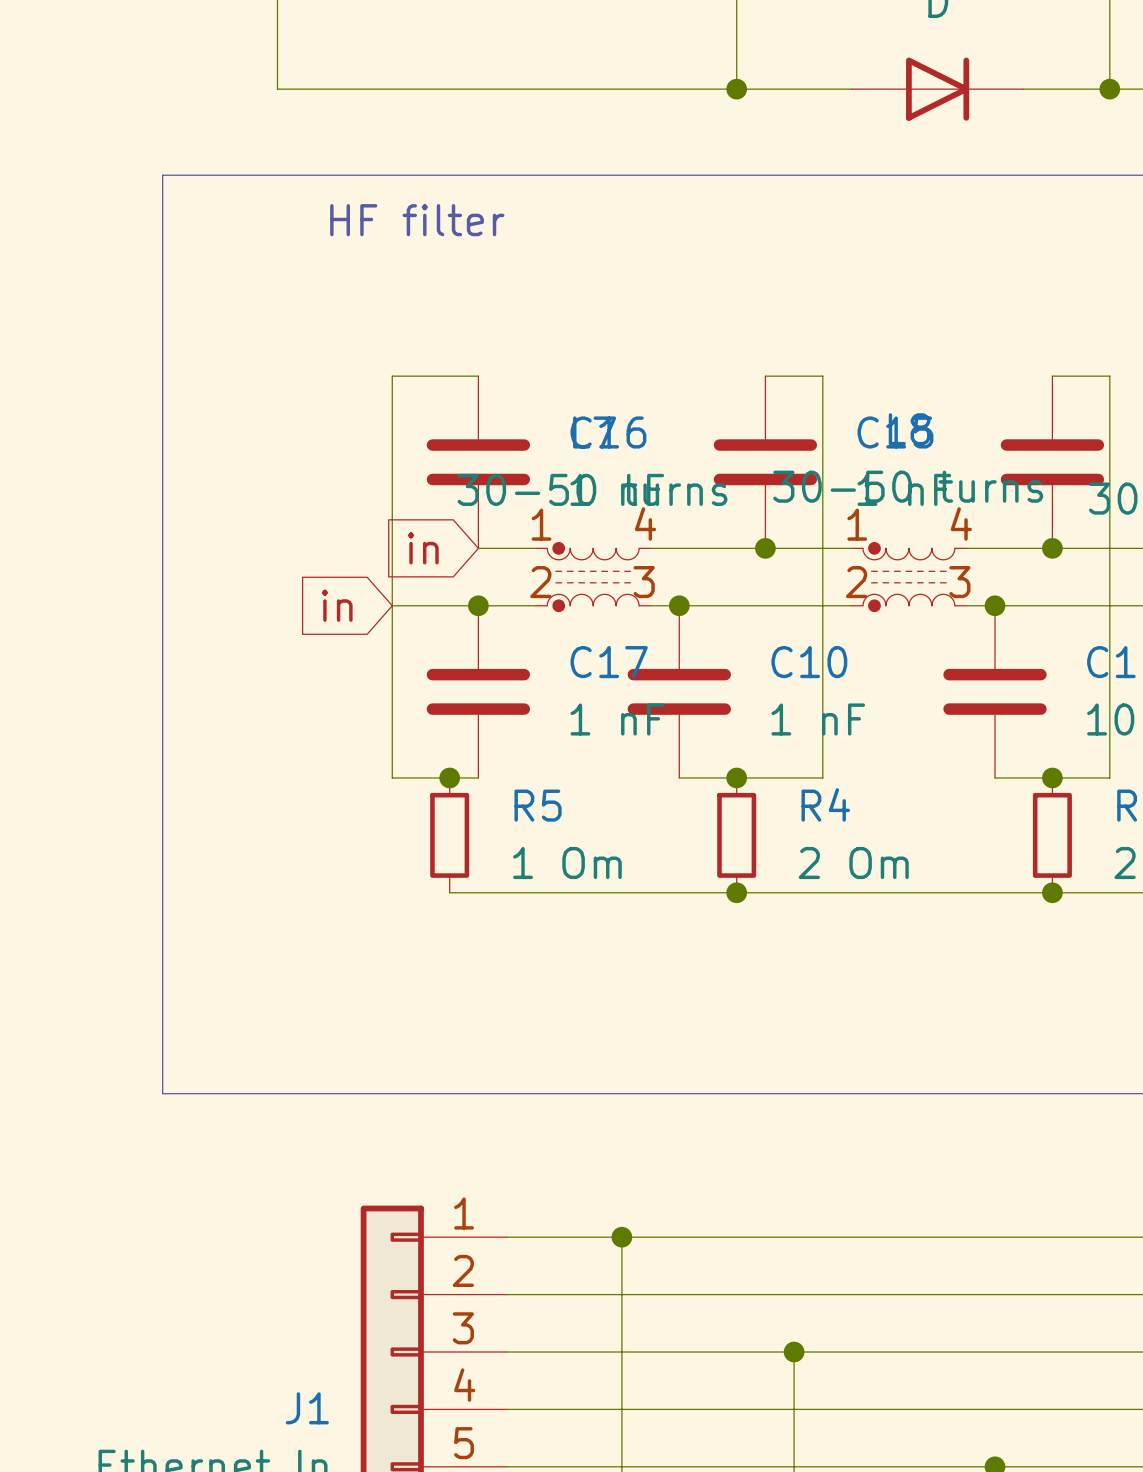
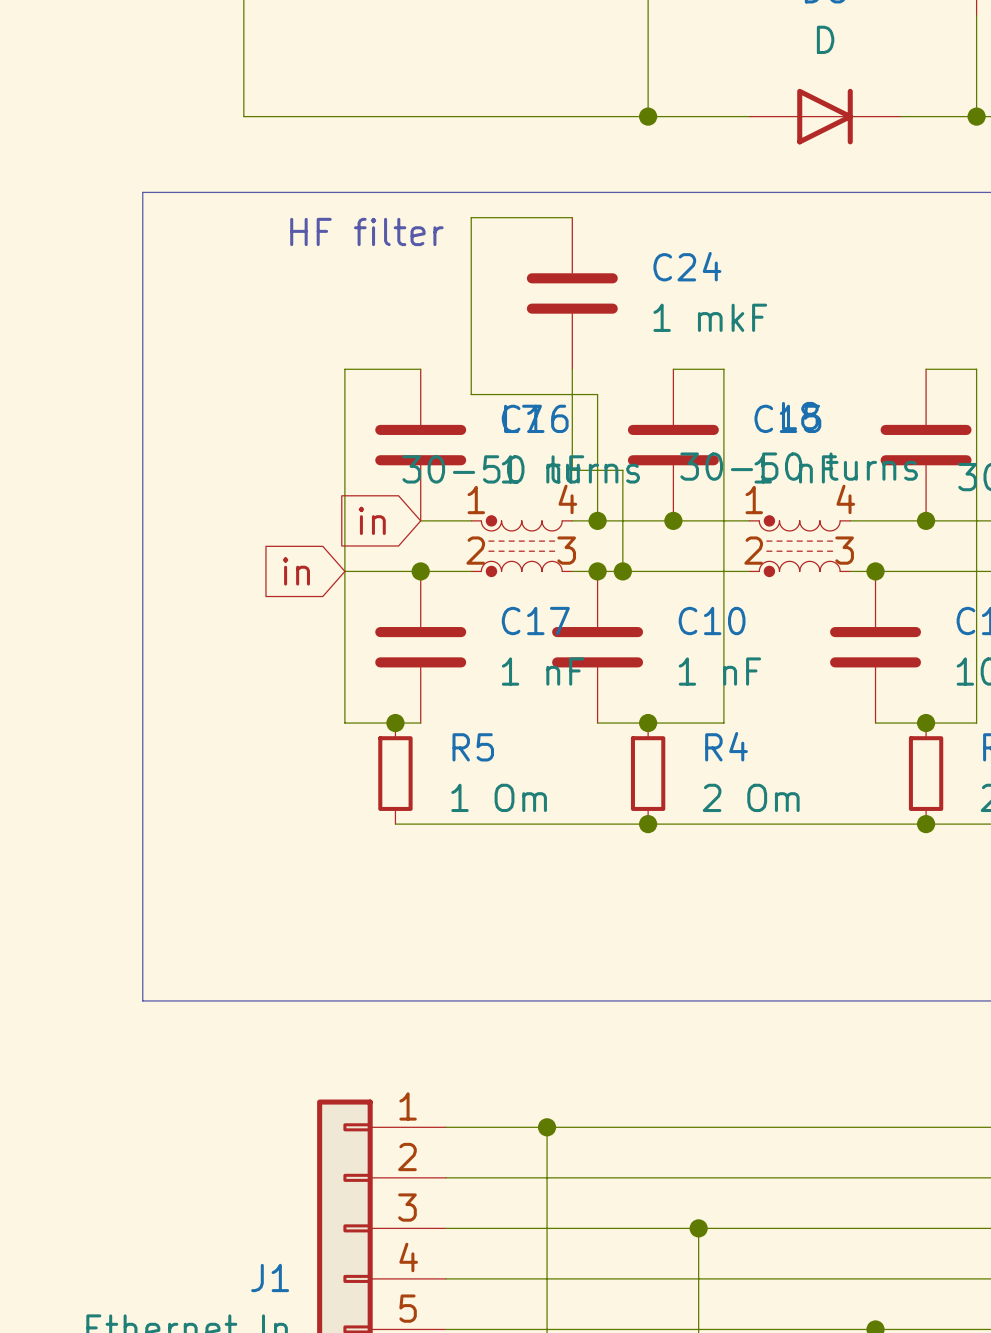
wire: none -> (572, 217) (471, 217) (471, 394) (597, 394) (597, 520)
C24: none -> 1 mkF (572, 293)
wire: none -> (572, 369) (572, 470) (622, 470) (622, 571)
junction: none -> (597, 520)
junction: none -> (622, 571)

